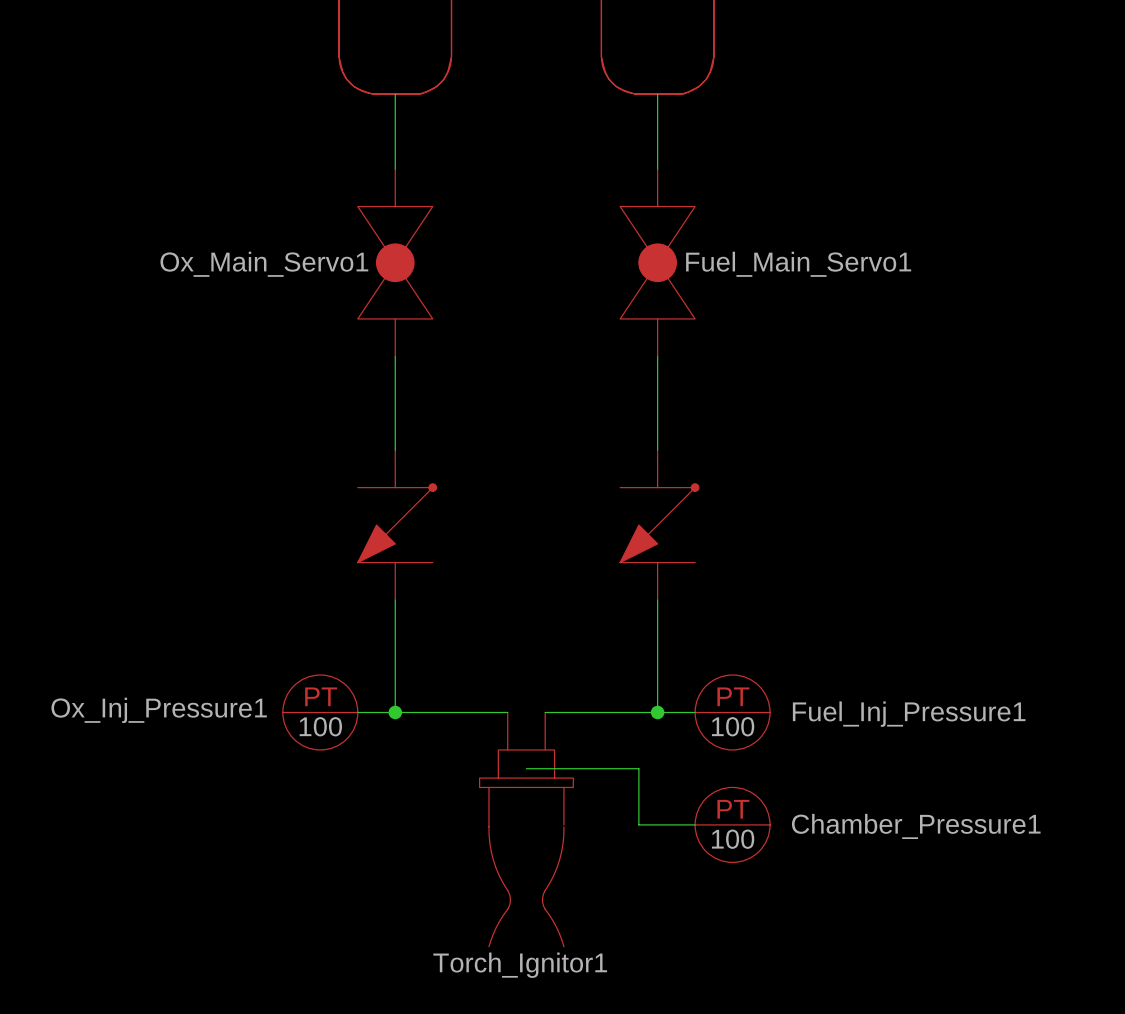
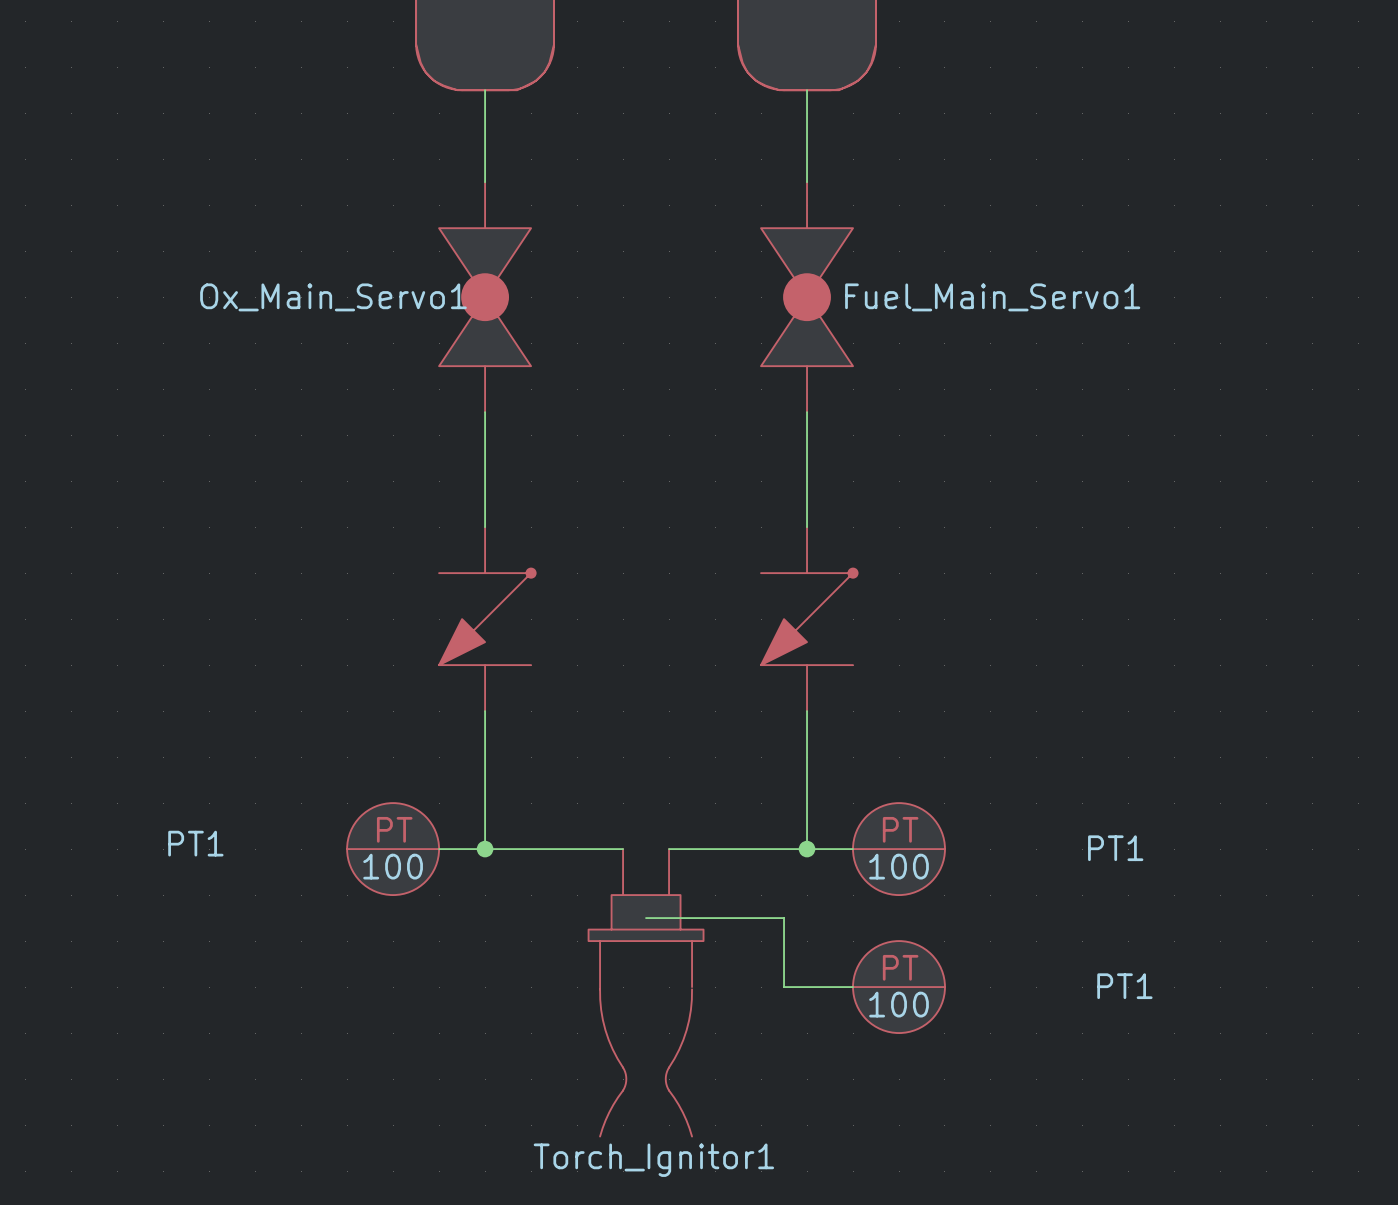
Ox_Inj_Pressure1 name: Ox_Inj_Pressure1 (159, 710) -> PT1 (195, 843)
Fuel_Inj_Pressure1 name: Fuel_Inj_Pressure1 (909, 714) -> PT1 (1115, 848)
Chamber_Pressure1 name: Chamber_Pressure1 (916, 826) -> PT1 (1124, 986)

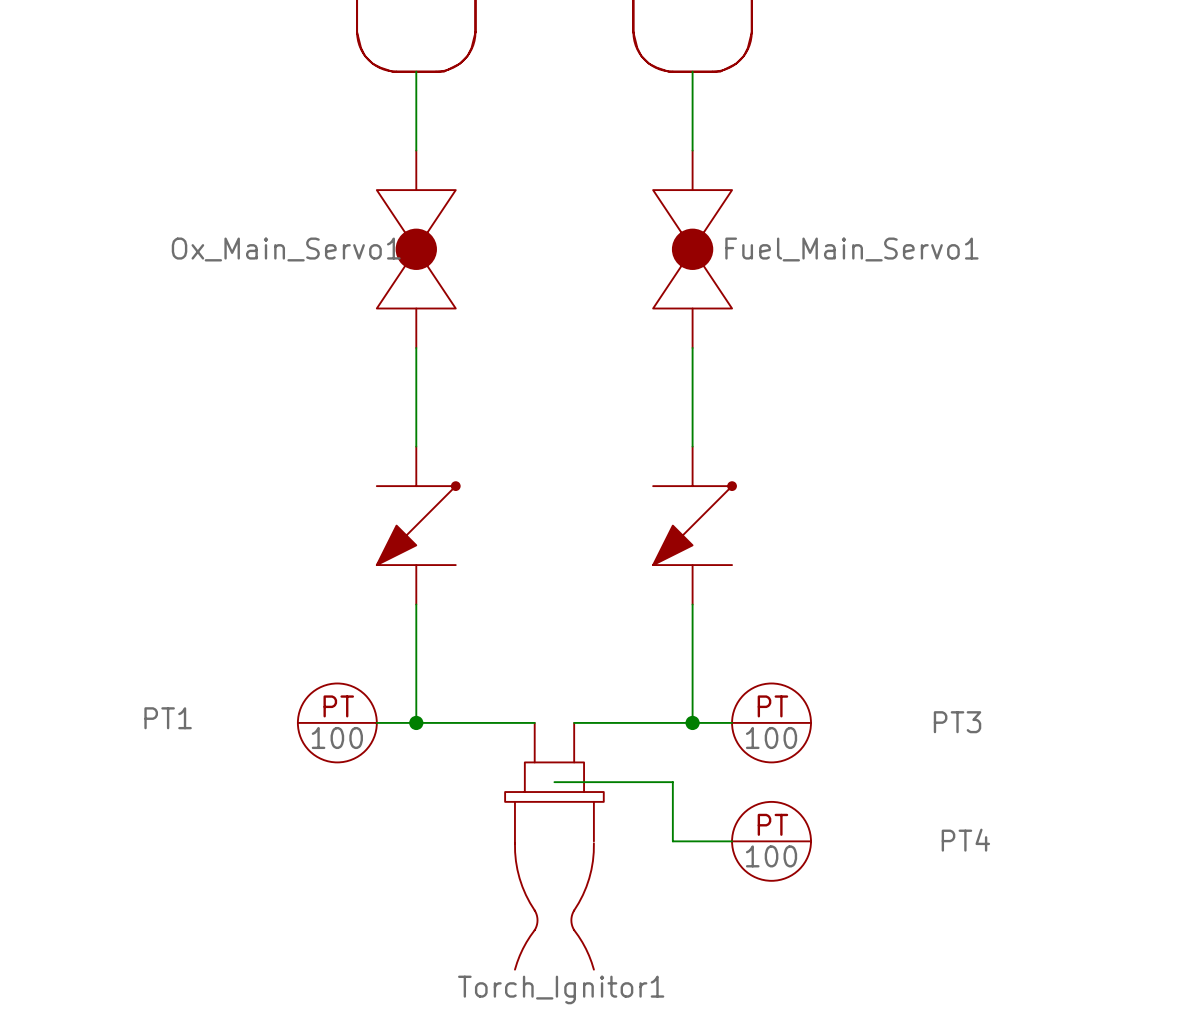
PT1 name: PT1 (1115, 848) -> PT3 (957, 722)
PT1 name: PT1 (1124, 986) -> PT4 (965, 840)

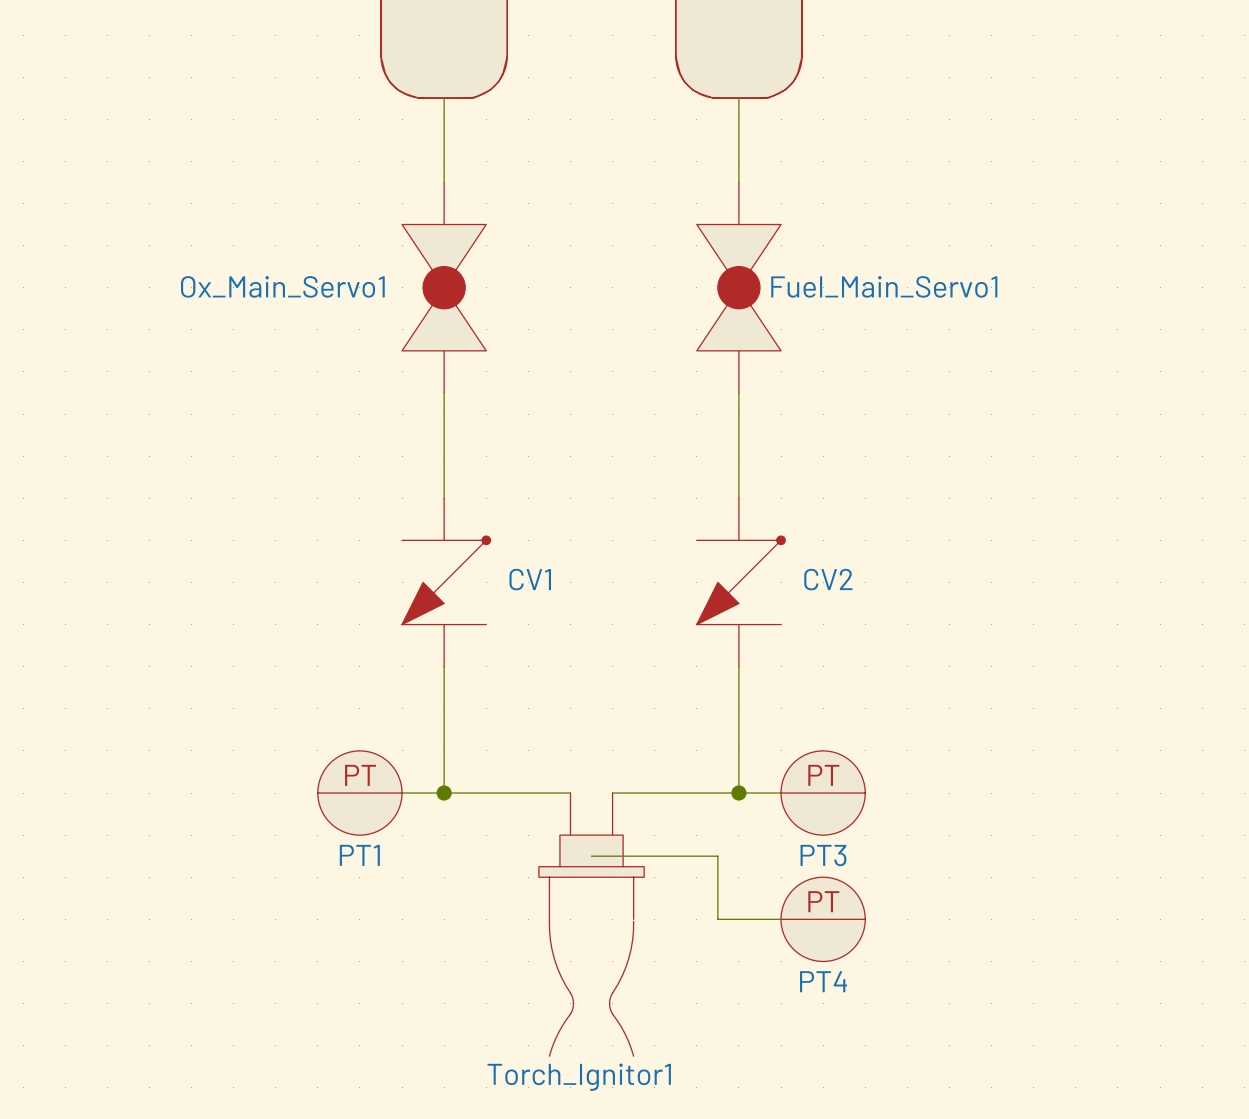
CV1 name: none -> CV1 (530, 579)
CV2 name: none -> CV2 (828, 579)
PT1 name position: PT1 (168, 718) -> PT1 (359, 855)
PT3 name position: PT3 (957, 722) -> PT3 (823, 855)
PT1 value: 100 (337, 737) -> none
PT3 value: 100 (771, 737) -> none
PT4 name position: PT4 (965, 840) -> PT4 (823, 981)
PT4 value: 100 (771, 856) -> none

